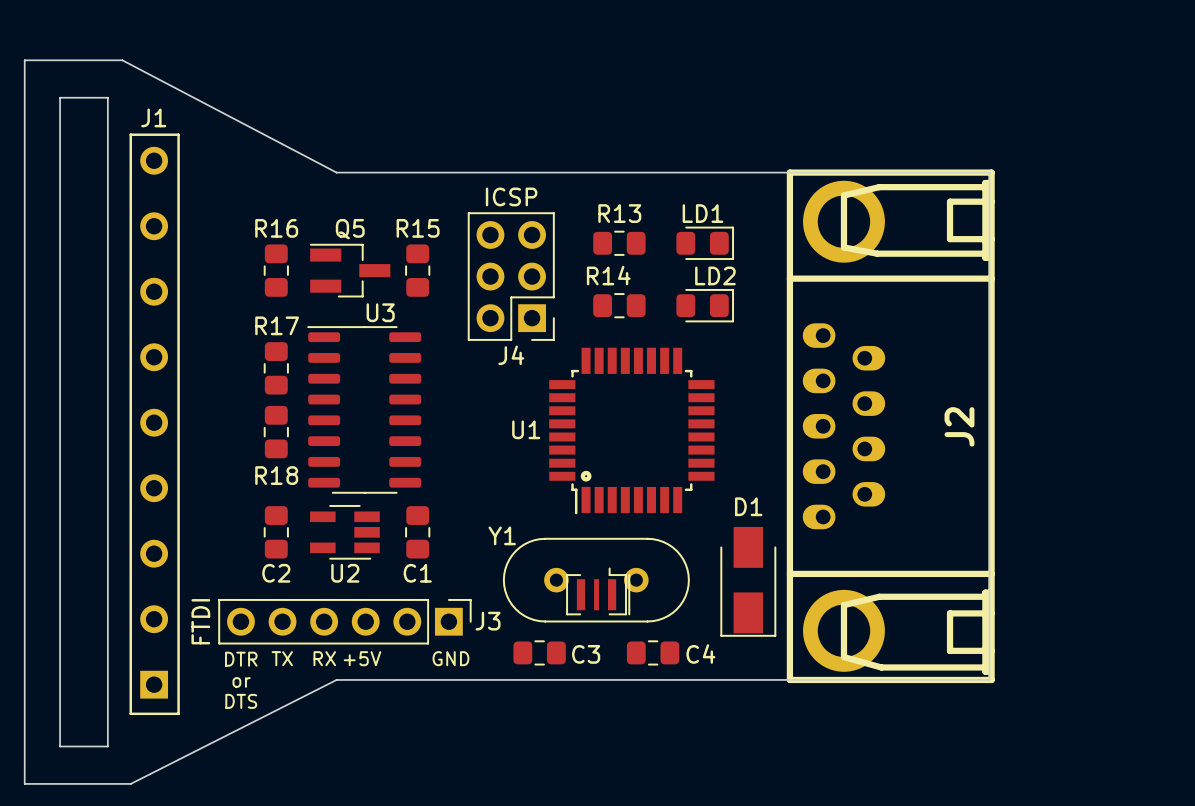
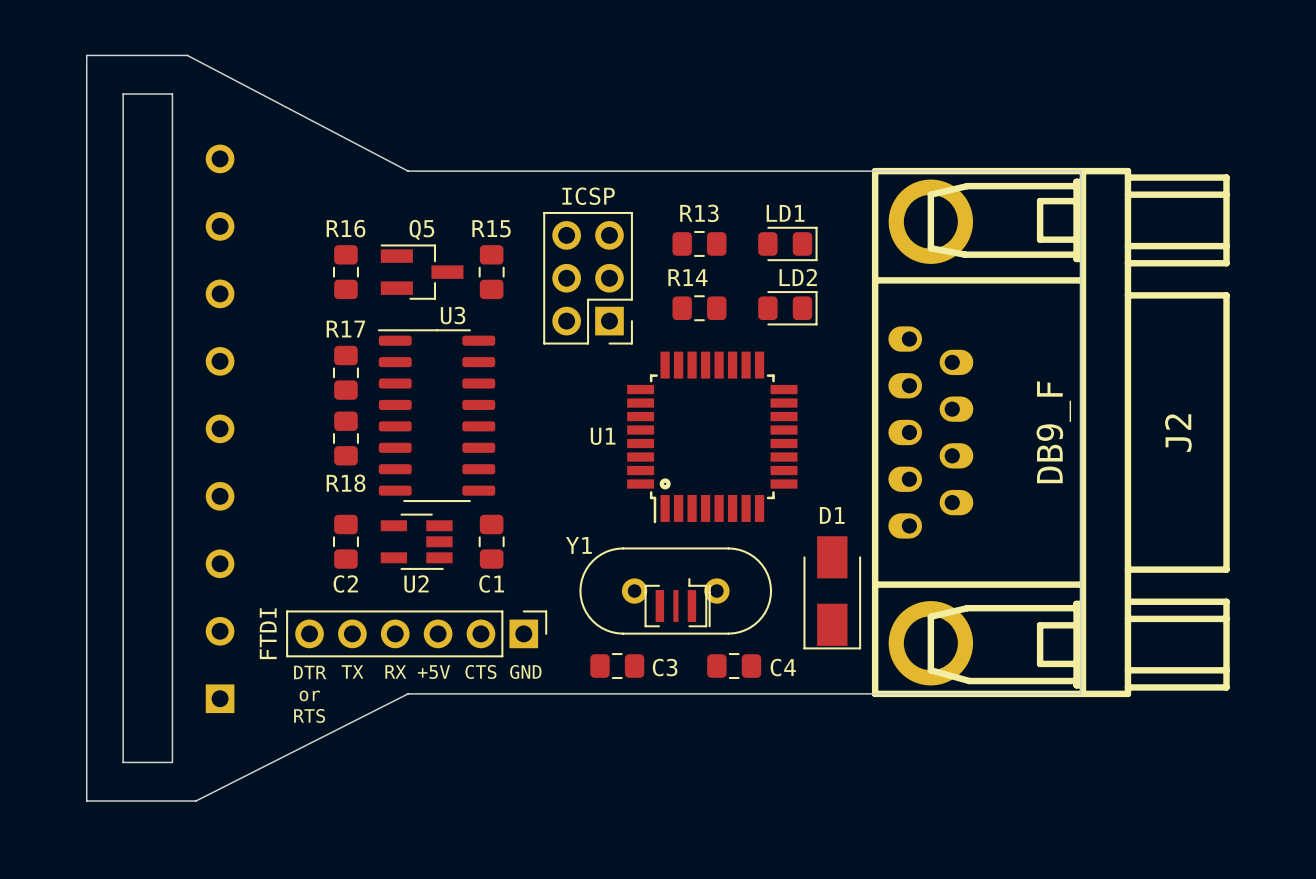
J2 footprint: [786, 169, 995, 684] -> [871, 167, 1230, 698]
J4 name: J4 (511, 355) -> none
J1: (154, 424) -> none
J2 value: none -> DB9_F (1053, 432)
J2 name position: J2 (959, 426) -> J2 (1178, 433)
J3 name: J3 (488, 621) -> none
text: none -> CTS (480, 671)
text: DTS (241, 701) -> RTS (309, 715)

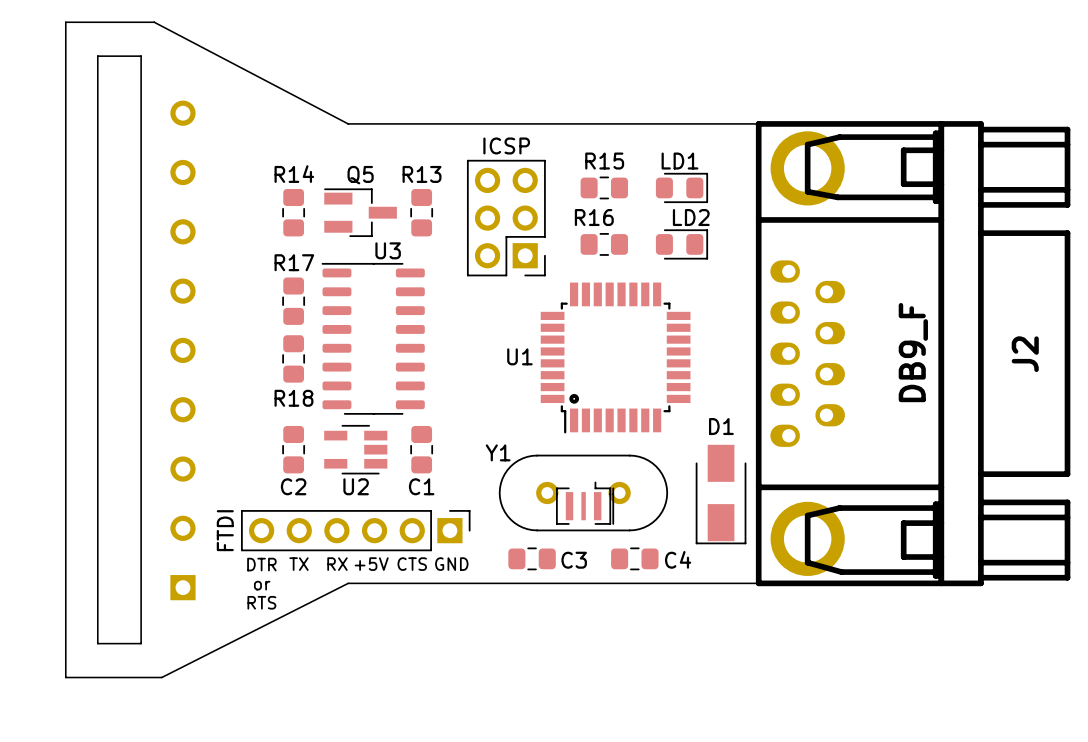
R13 name: R13 (699, 213) -> R15 (604, 161)
R16 name: R16 (346, 228) -> R14 (294, 174)
R15 name: R15 (491, 228) -> R13 (422, 174)
R14 name: R14 (687, 277) -> R16 (594, 217)

